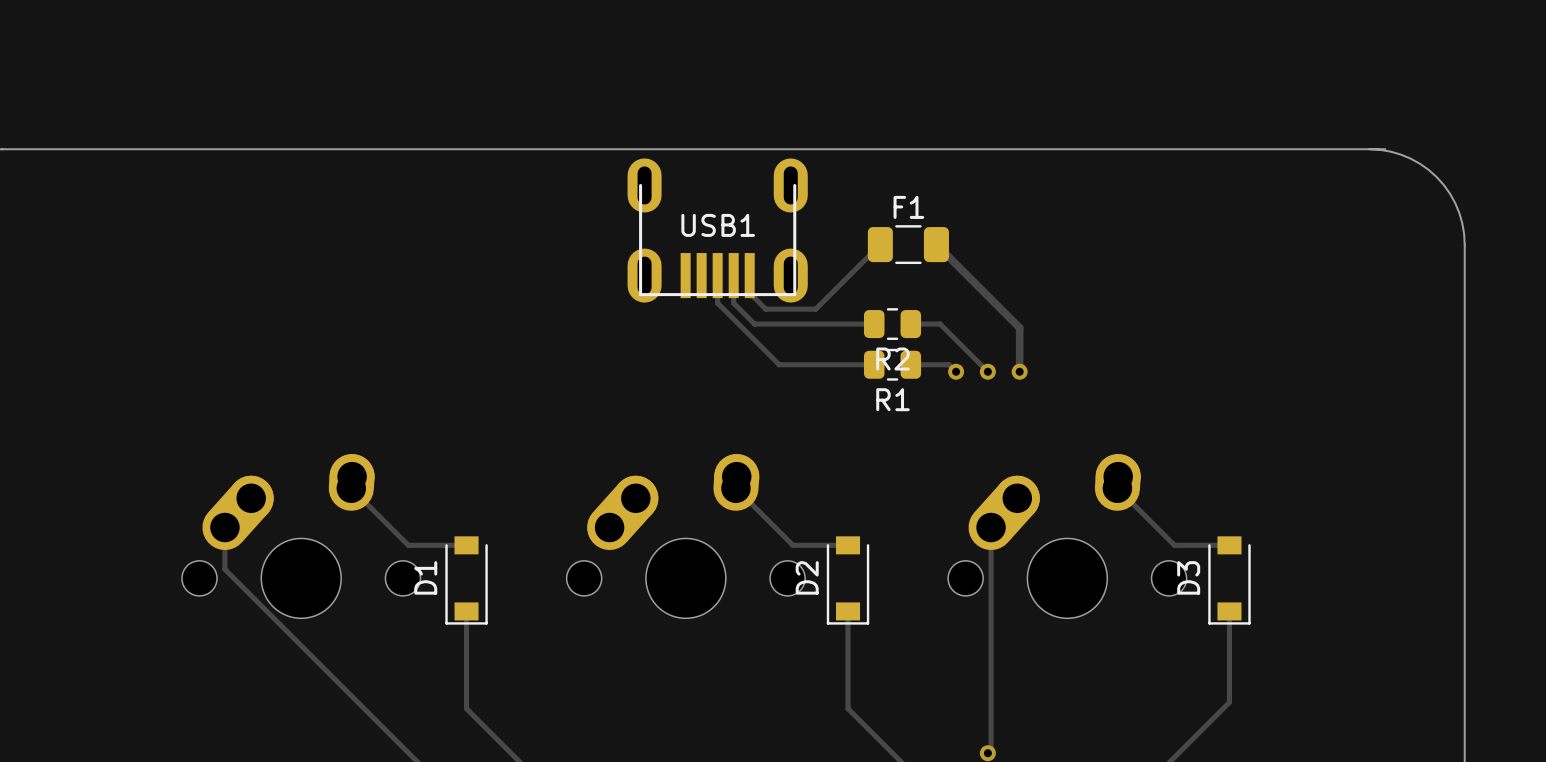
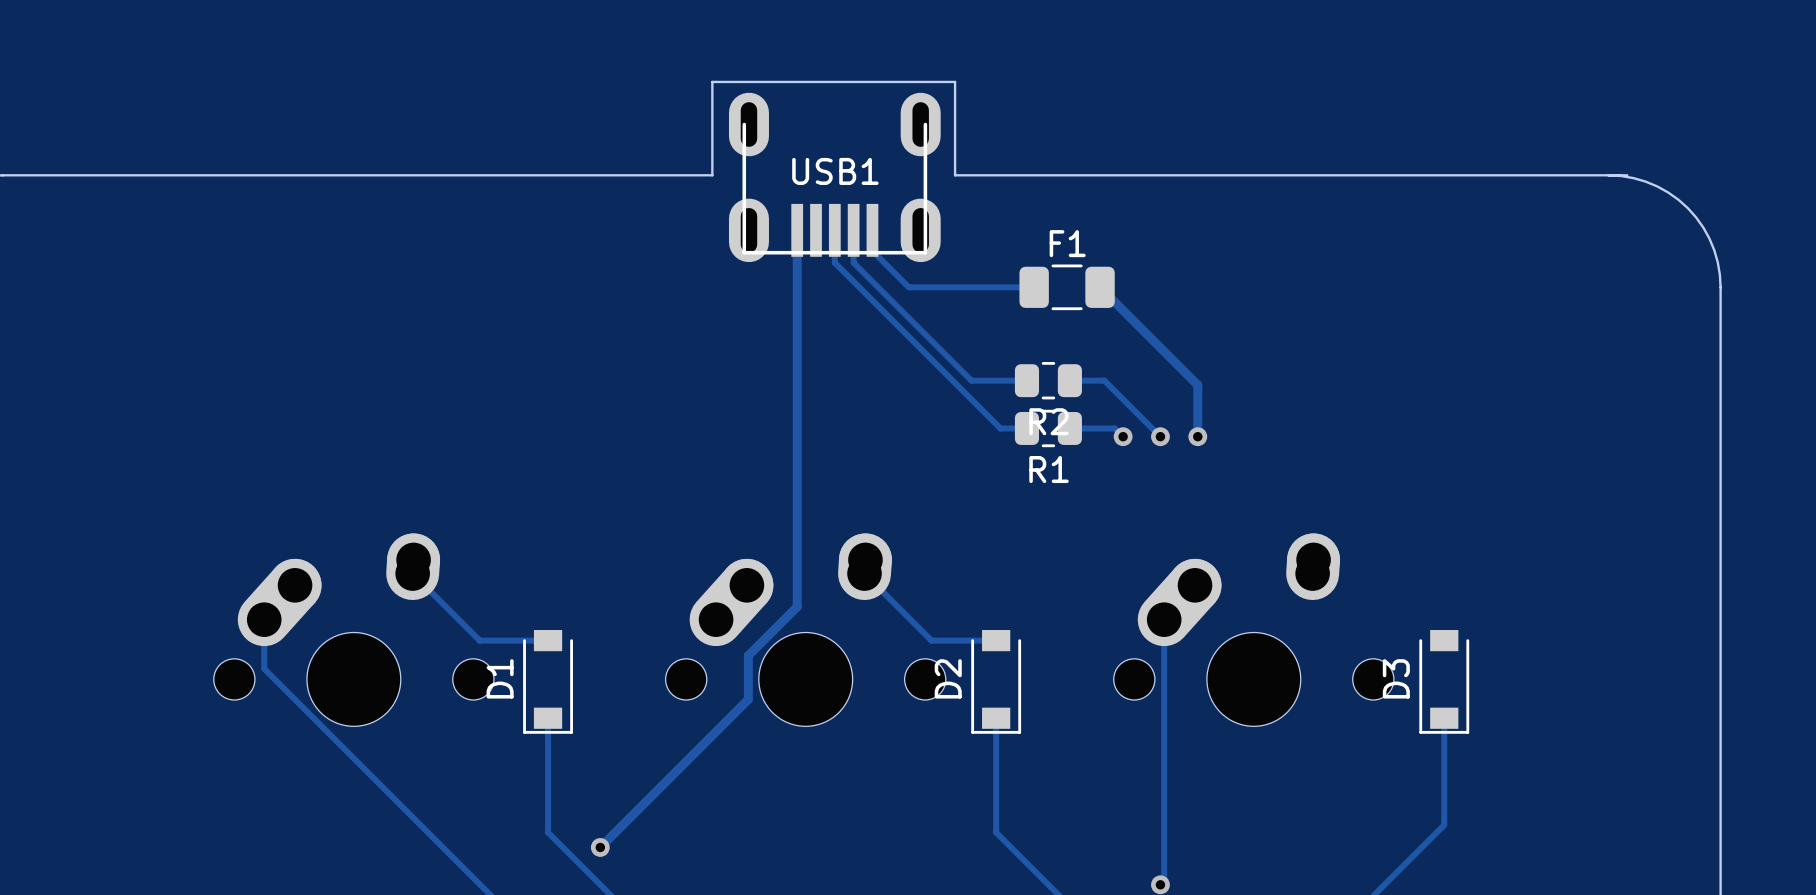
board edge: (606, 149) (813, 149) -> (712, 175) (712, 81) (955, 81) (955, 175)
track: none -> (797, 230) (797, 606) (748, 655) (748, 699) (600, 847)
USB1 position: (717, 230) -> (834, 177)
track: (880, 244) (815, 309) (765, 309) (749, 293) (749, 275) -> (1034, 287) (908, 287) (872, 250) (872, 230)
track: (717, 275) (717, 303) (779, 364) (851, 364) -> (834, 230) (834, 262) (1000, 428)
track: (733, 275) (733, 303) (754, 324) (827, 324) -> (853, 230) (853, 262) (971, 380)
track: (1117, 488) (1174, 545) (1229, 545) -> none
via: none -> (600, 847)

